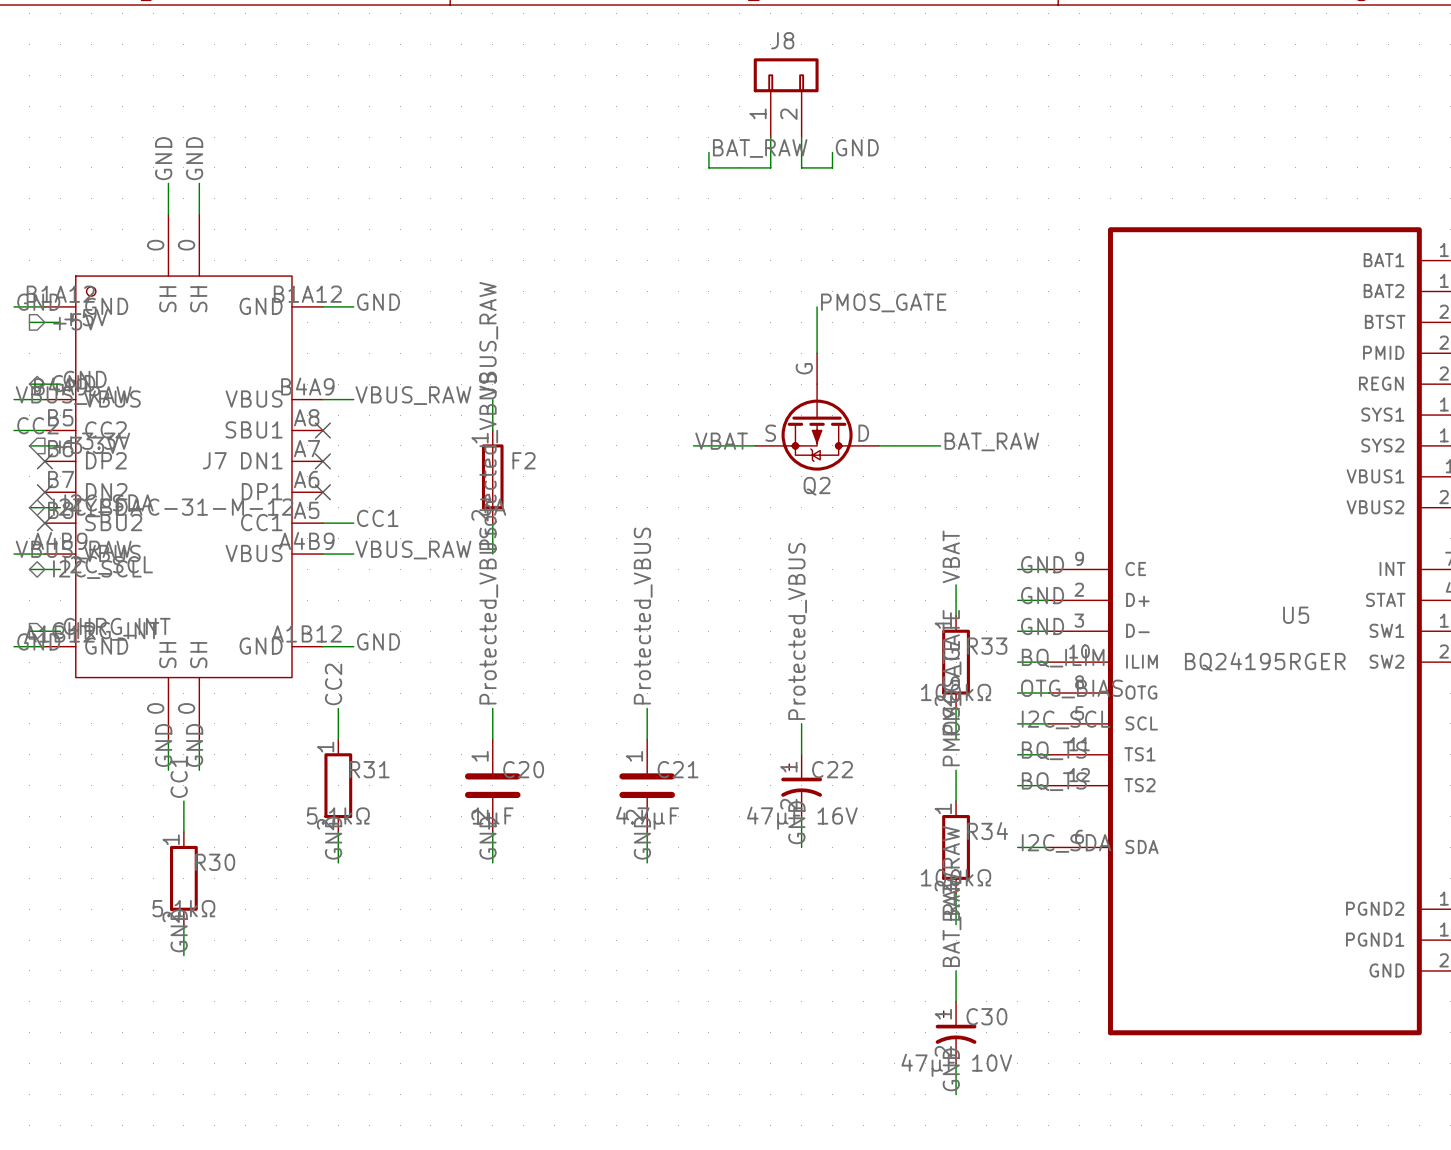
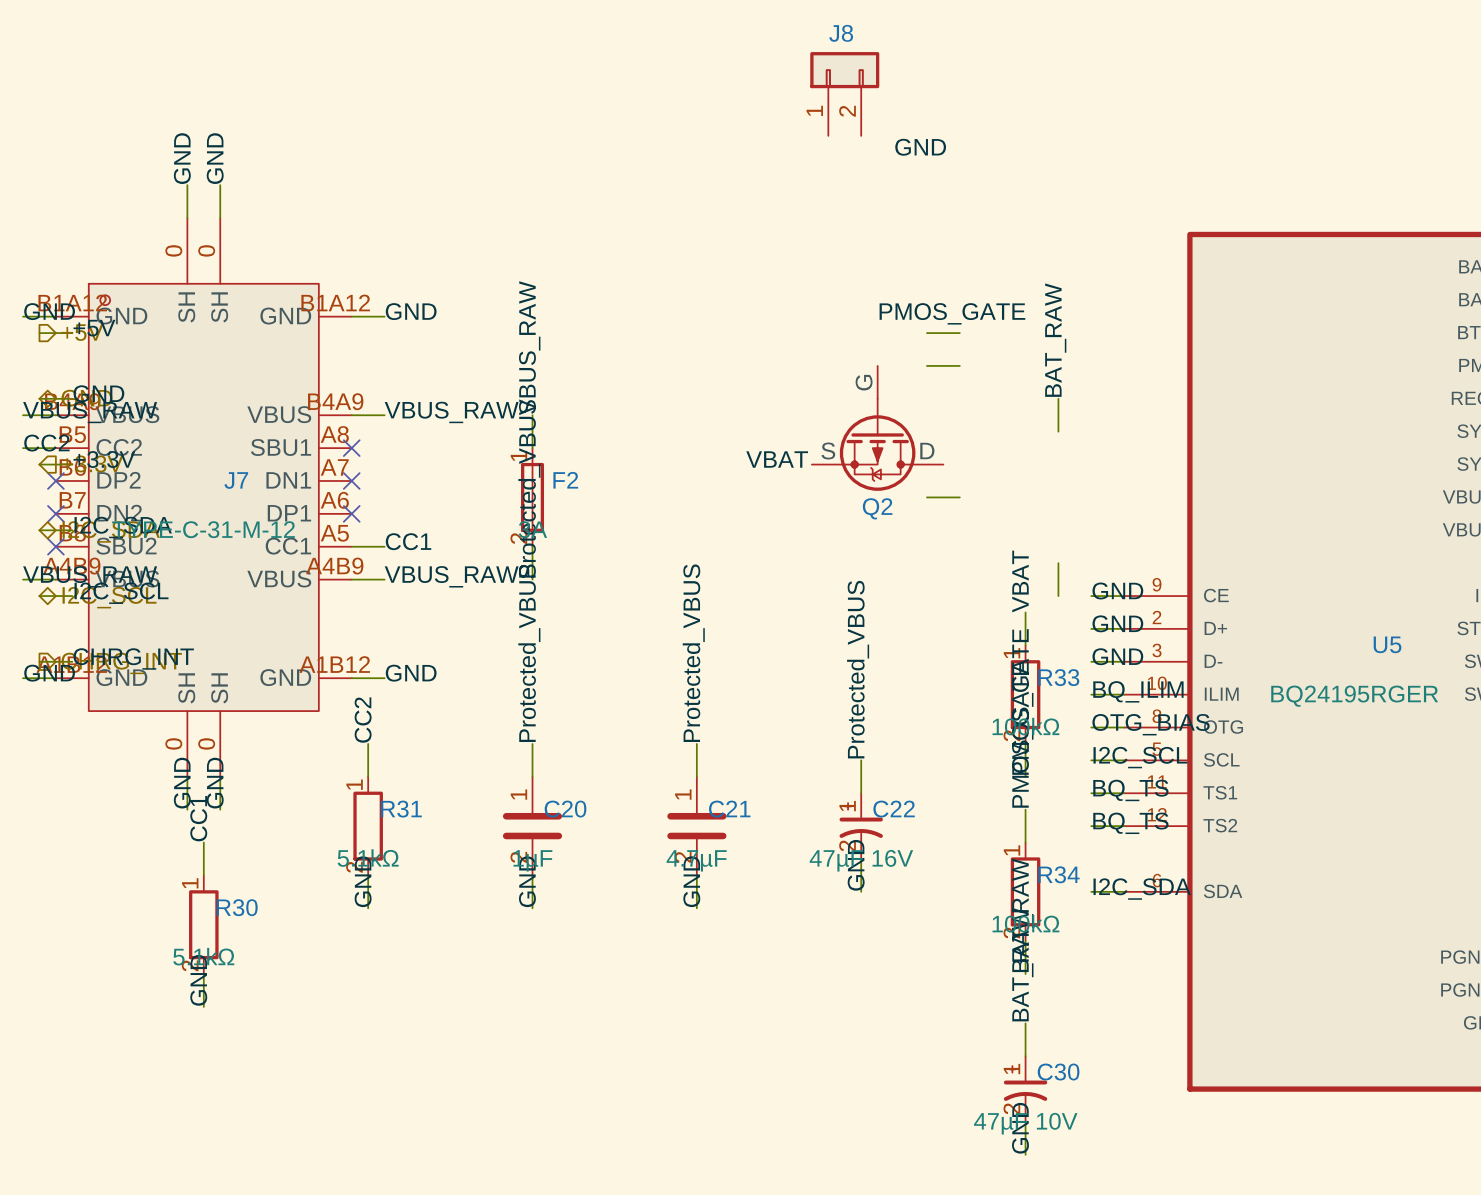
wire: (770, 137) (770, 167) (708, 167) (708, 152) -> none
wire: (801, 137) (801, 167) (832, 167) (832, 152) -> none
label: BAT_RAW (760, 148) -> none
wire: (817, 306) (817, 353) -> none
wire: none -> (926, 333) (959, 333)
wire: none -> (926, 365) (959, 365)
wire: none -> (1058, 398) (1058, 431)
label rotation: 0° (991, 441) -> 90° counterclockwise (1055, 340)
wire: (693, 445) (755, 445) -> none
wire: (878, 445) (940, 445) -> none
wire: none -> (926, 497) (959, 497)
wire: none -> (1058, 563) (1058, 596)

